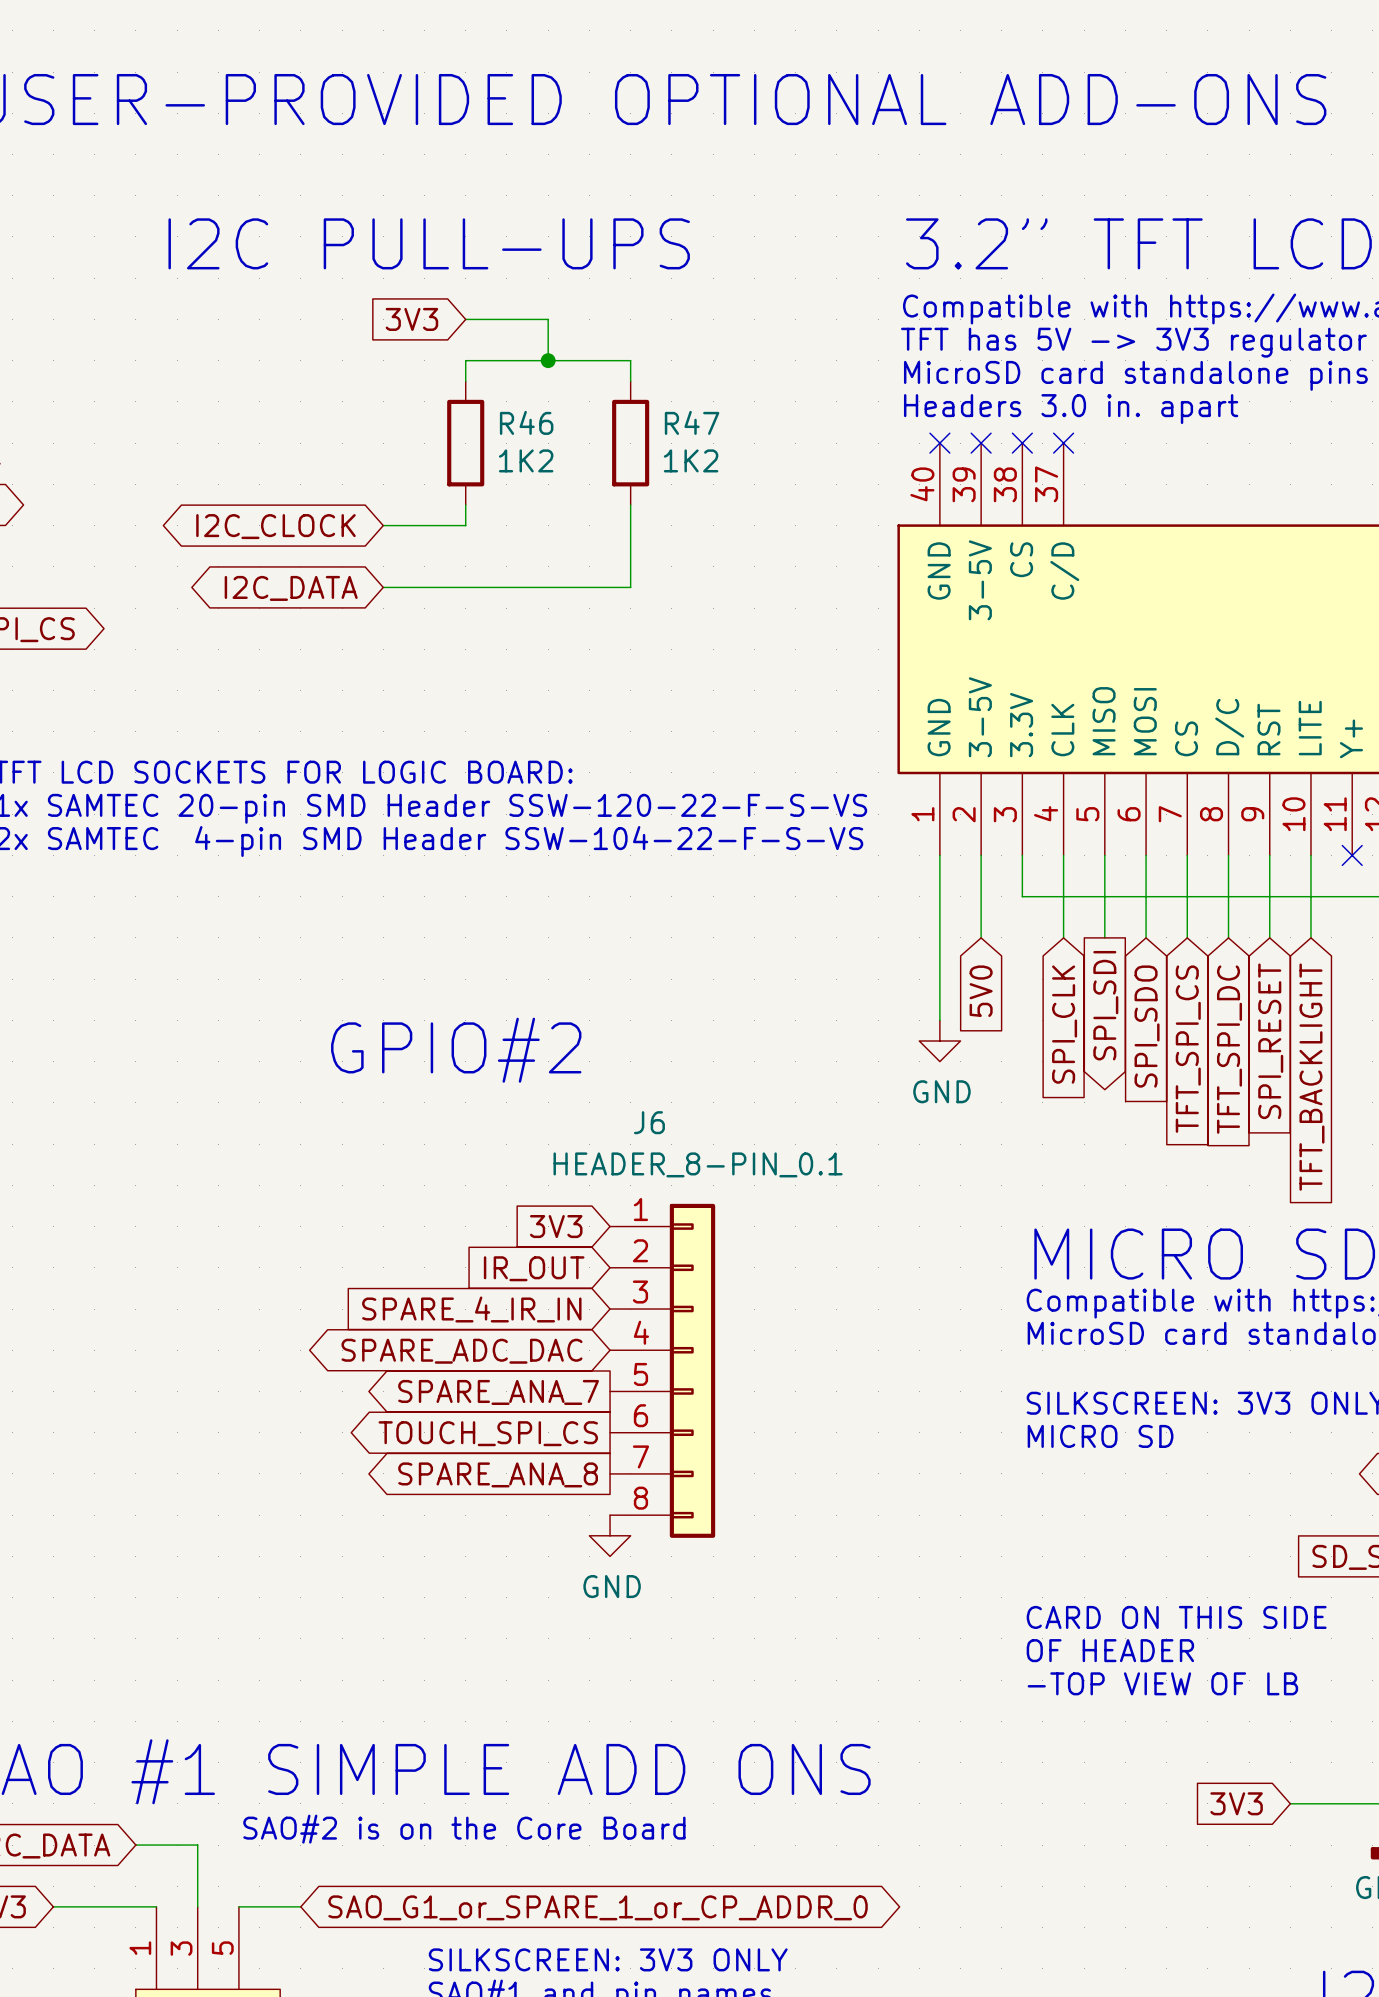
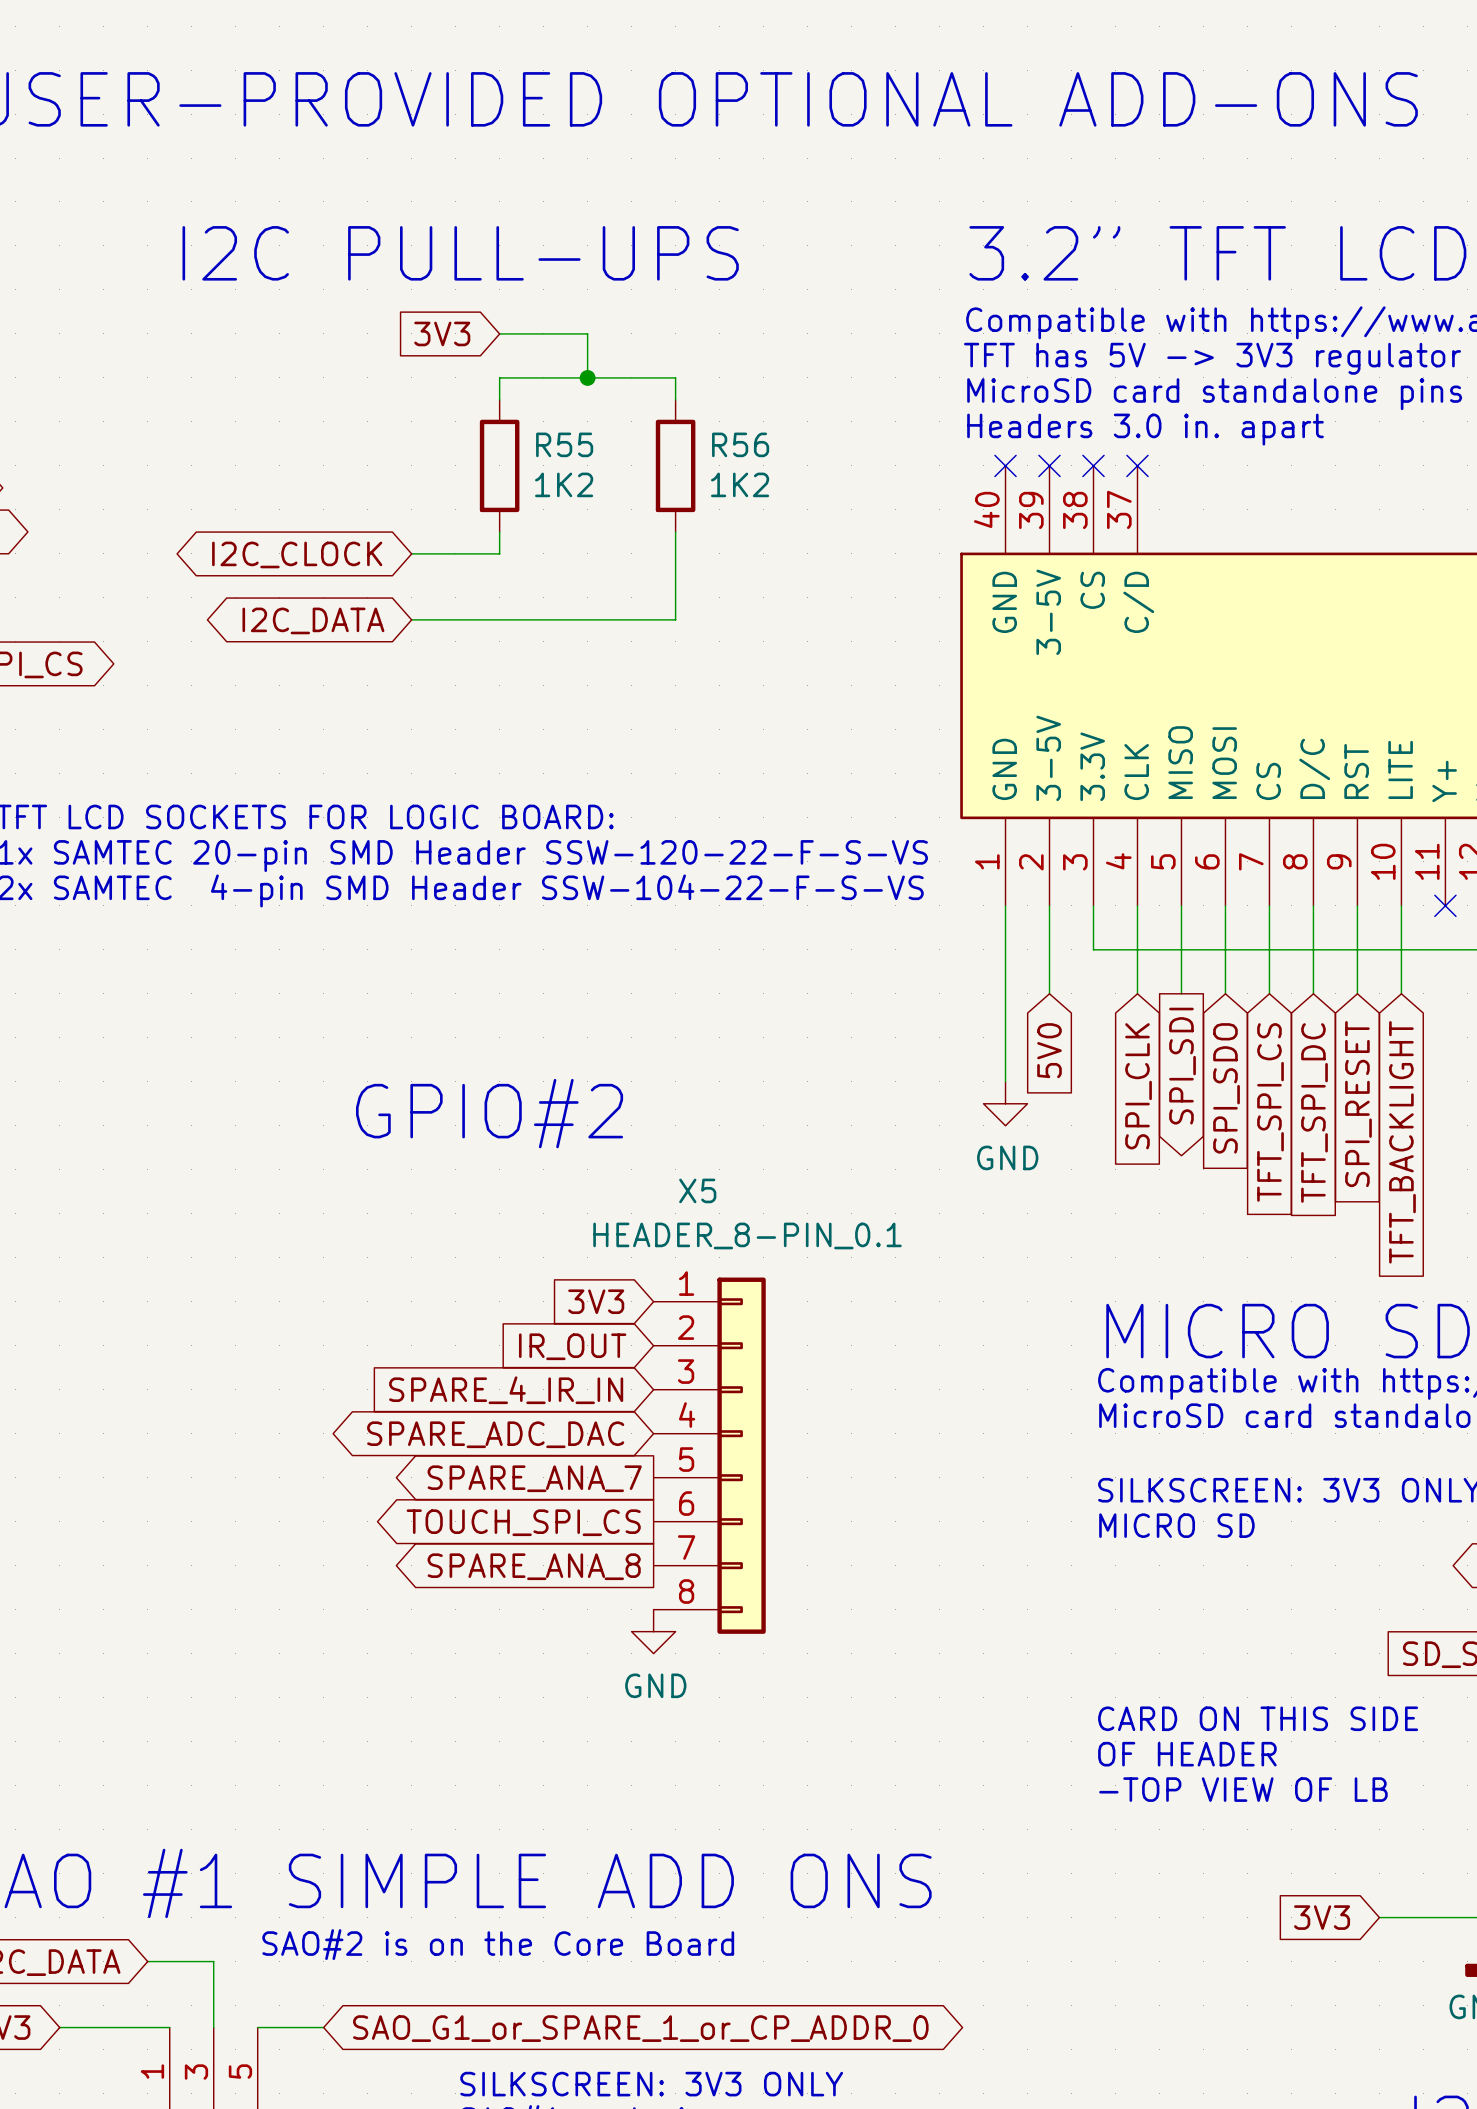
R46 name: R46 (526, 422) -> R55 (564, 444)
R47 name: R47 (692, 422) -> R56 (740, 444)
J6 name: J6 (649, 1122) -> X5 (697, 1190)

